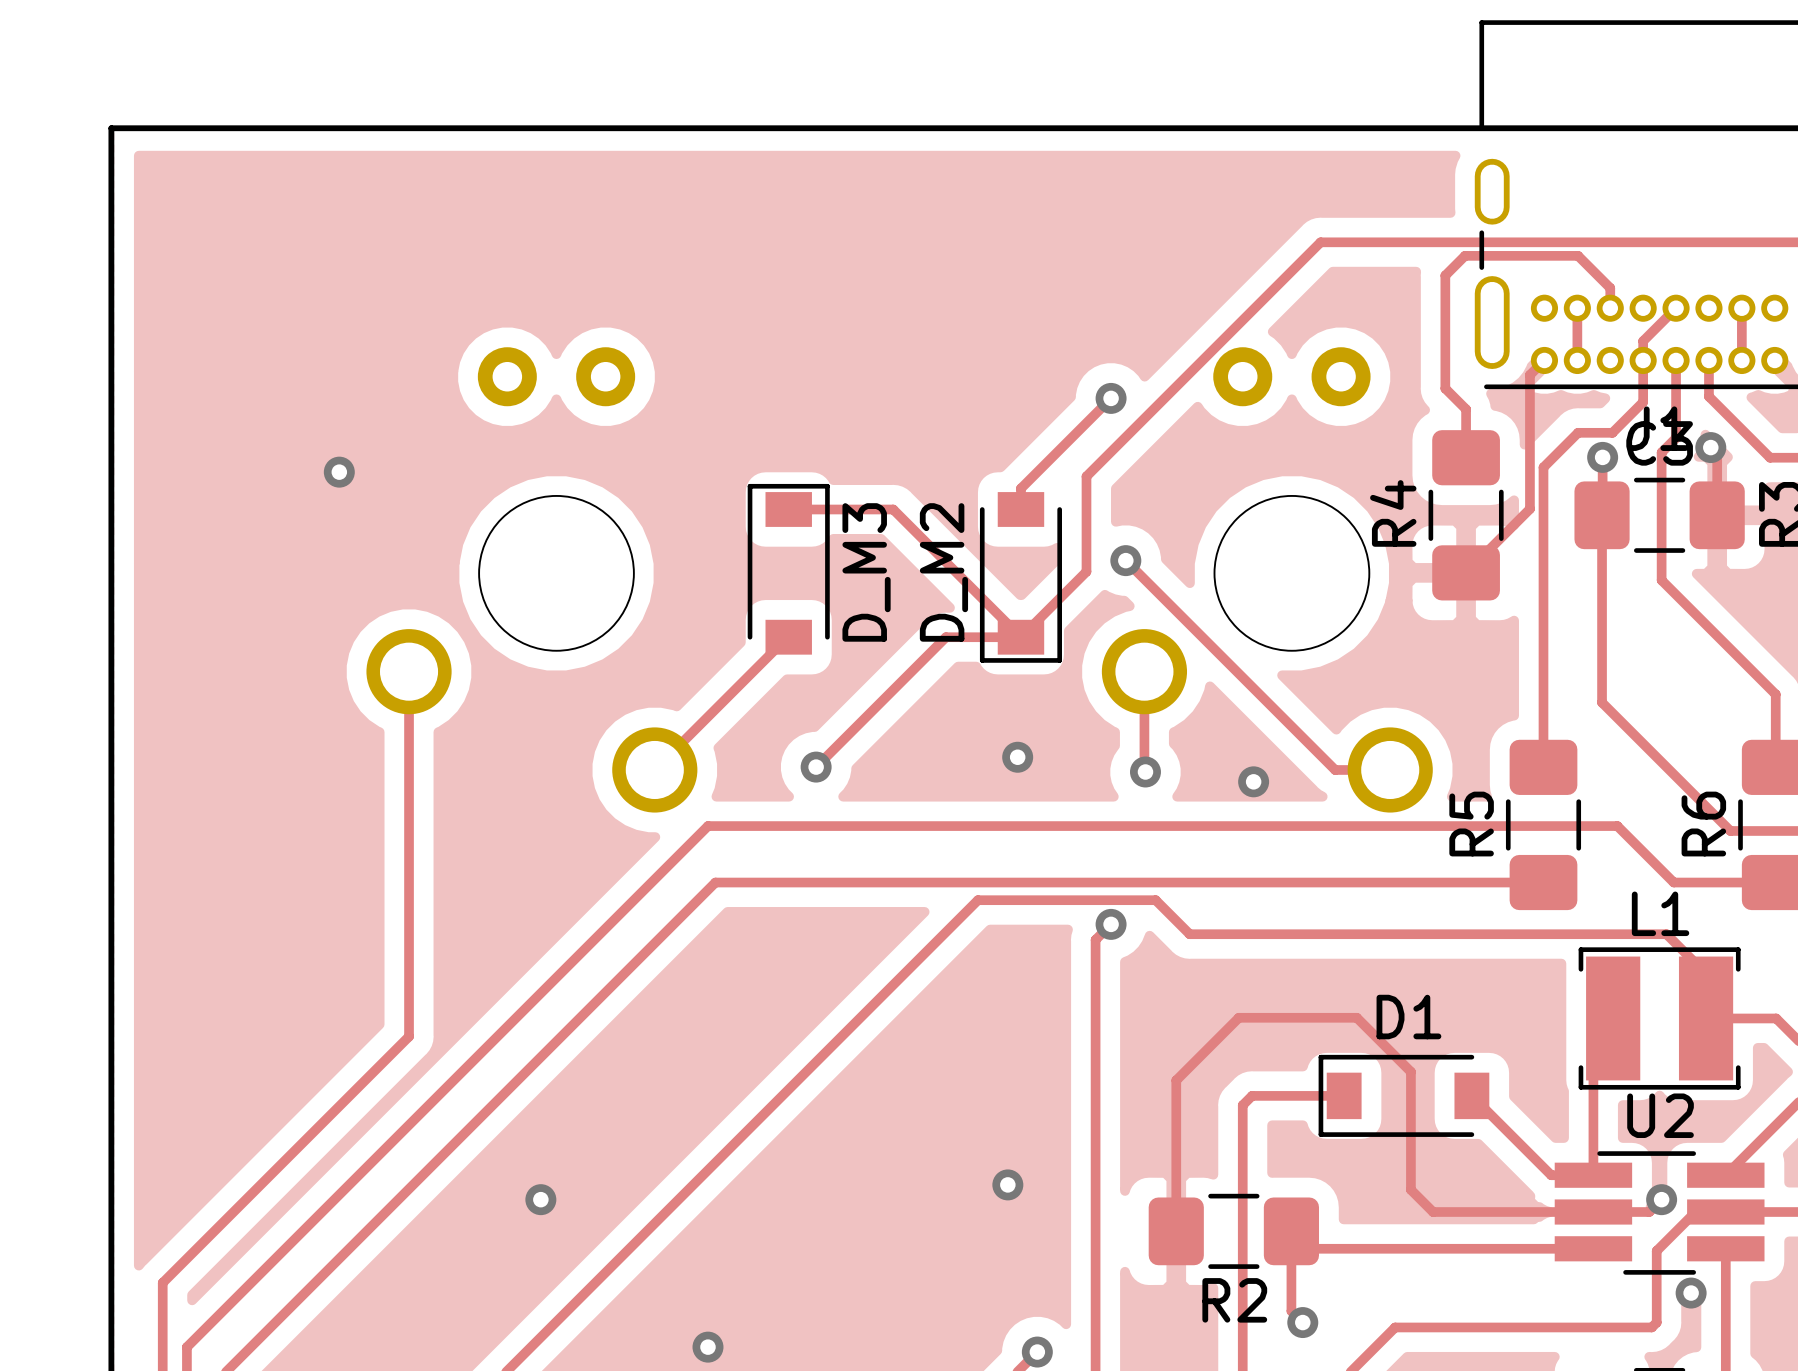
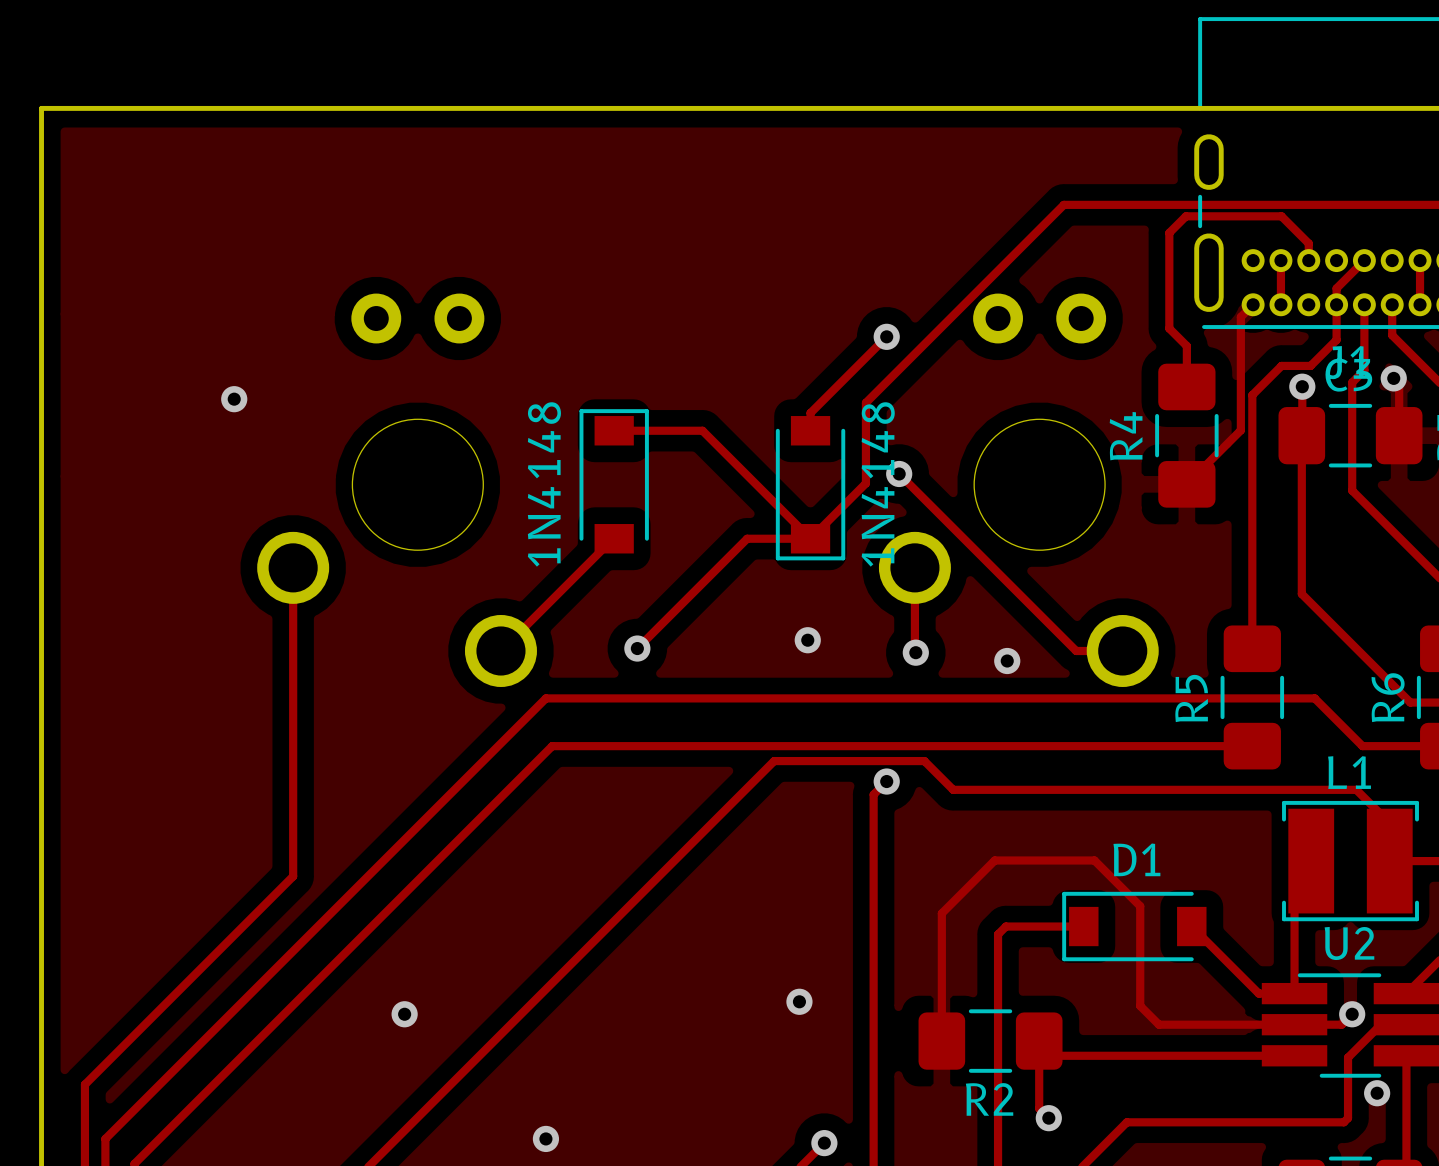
D_M3 name: D_M3 (866, 572) -> none
D_M2 name: D_M2 (943, 572) -> none
D_M3 value: none -> 1N4148 (544, 484)
D_M2 value: none -> 1N4148 (878, 484)

